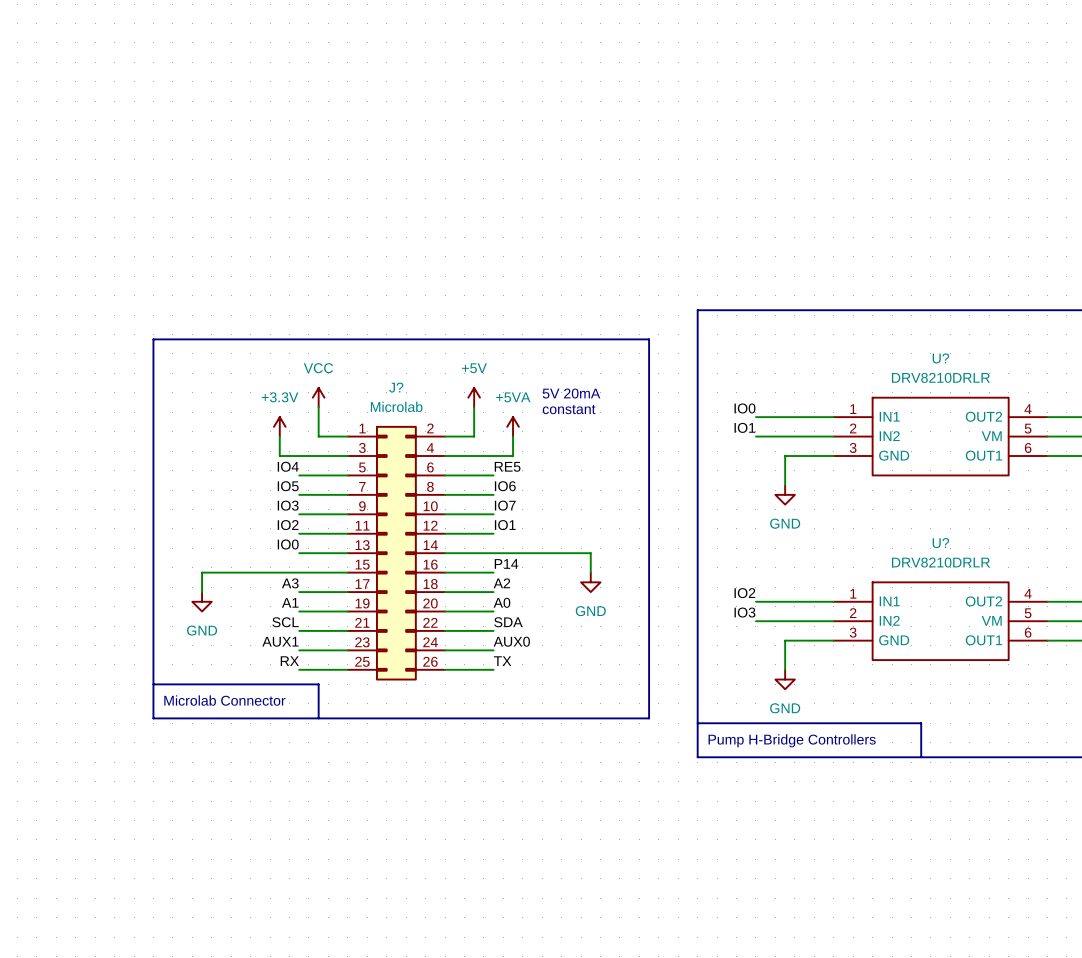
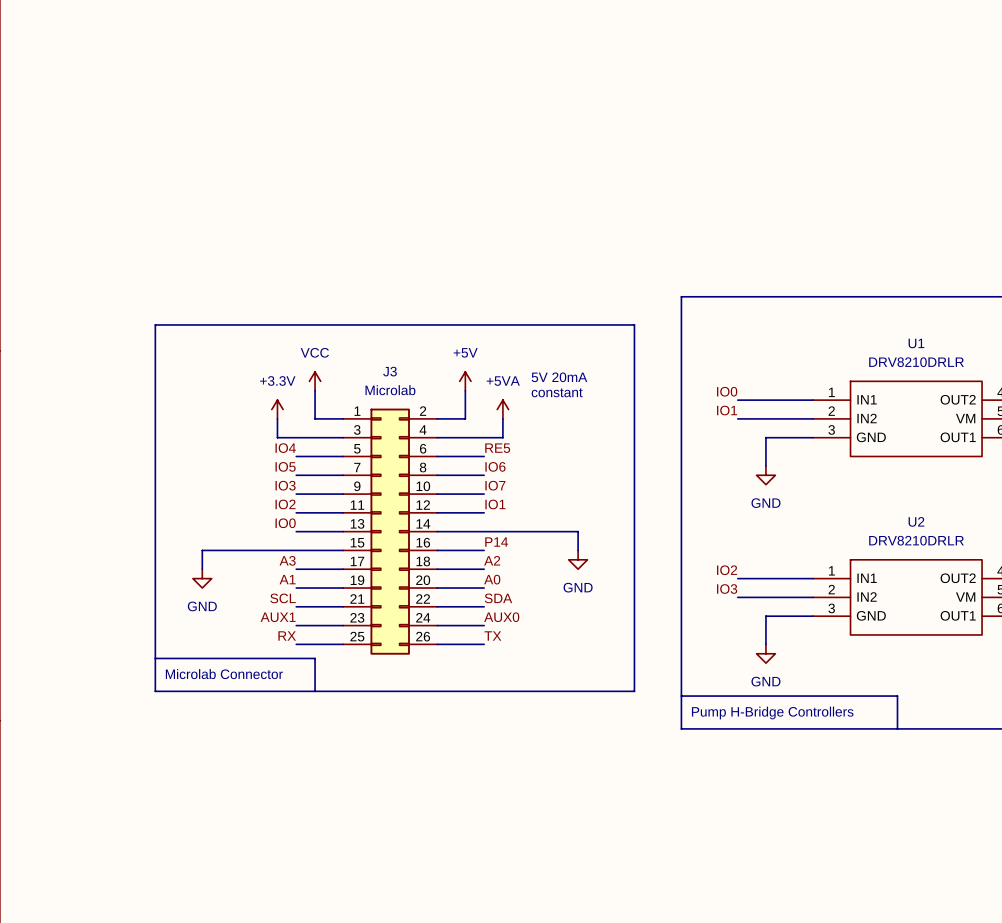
U? name: U? (940, 358) -> U1 (916, 343)
J? name: J? (396, 387) -> J3 (390, 371)
U? name: U? (940, 543) -> U2 (916, 521)

